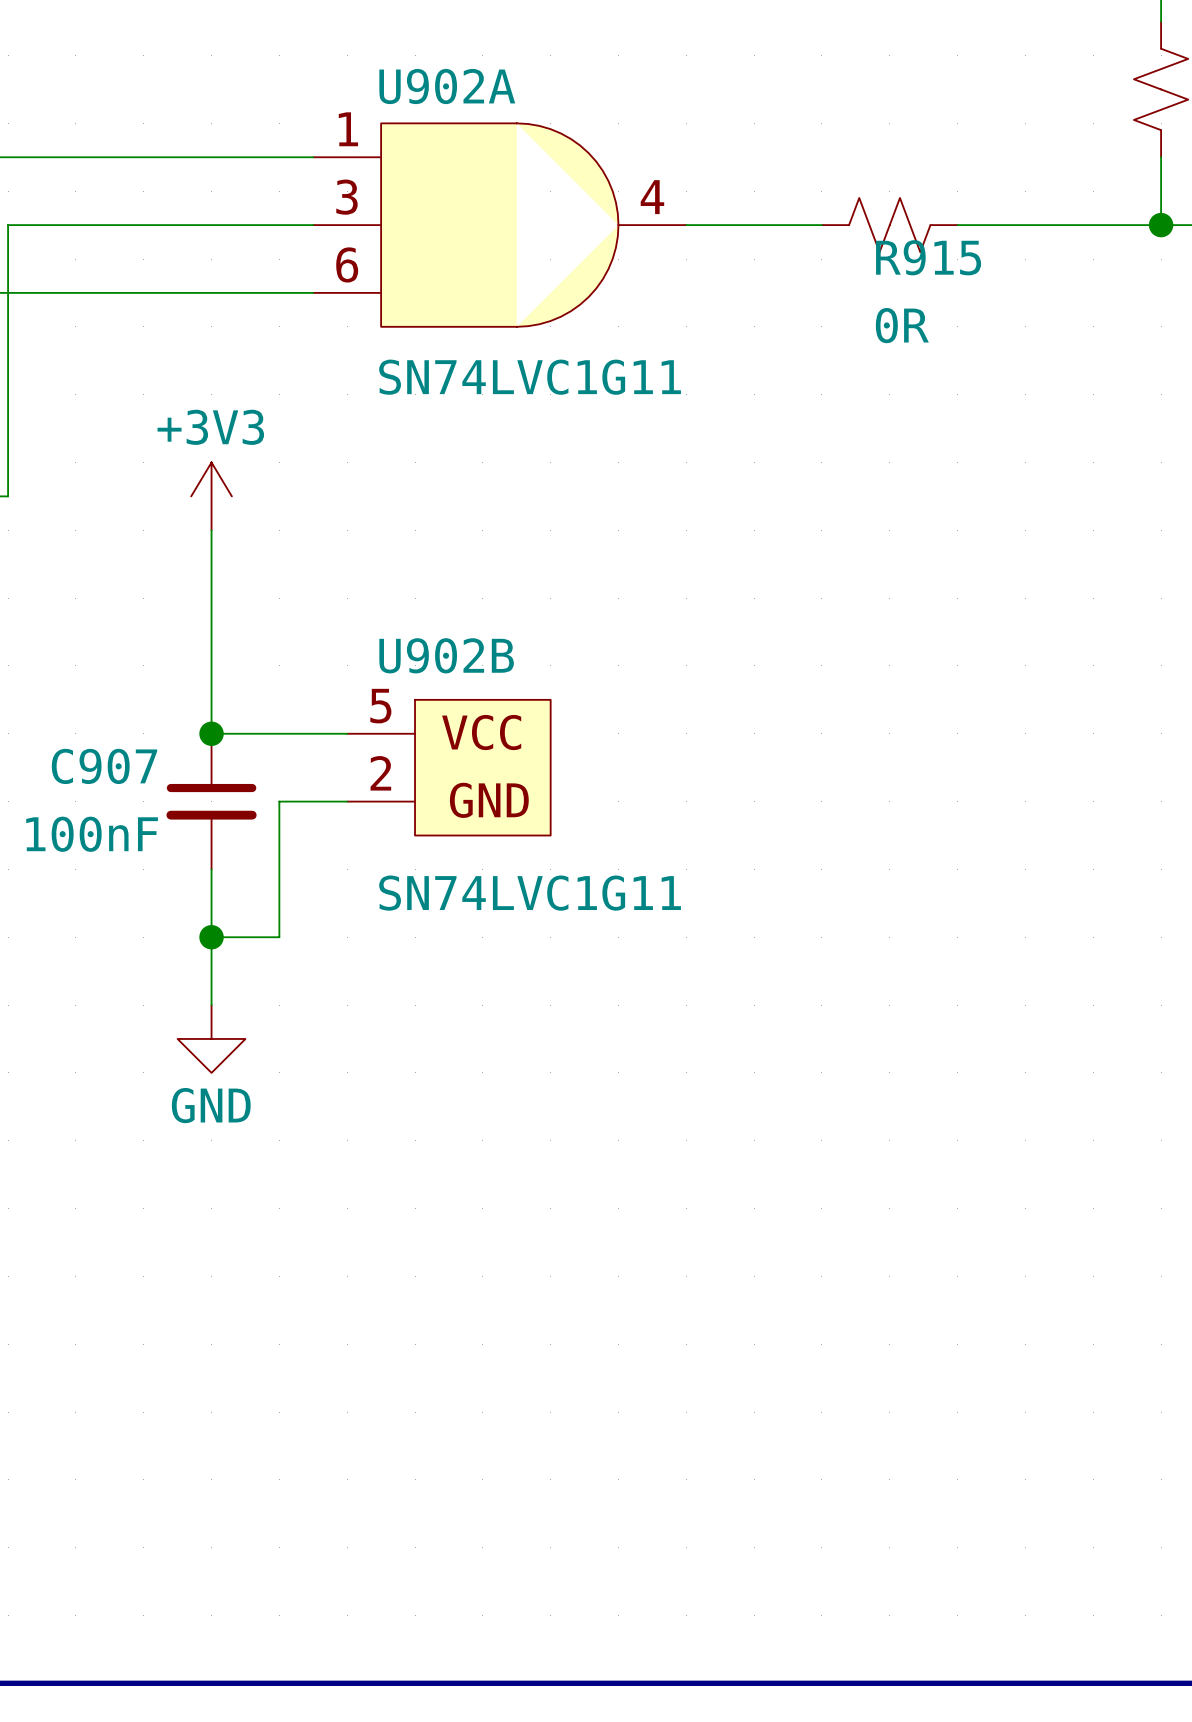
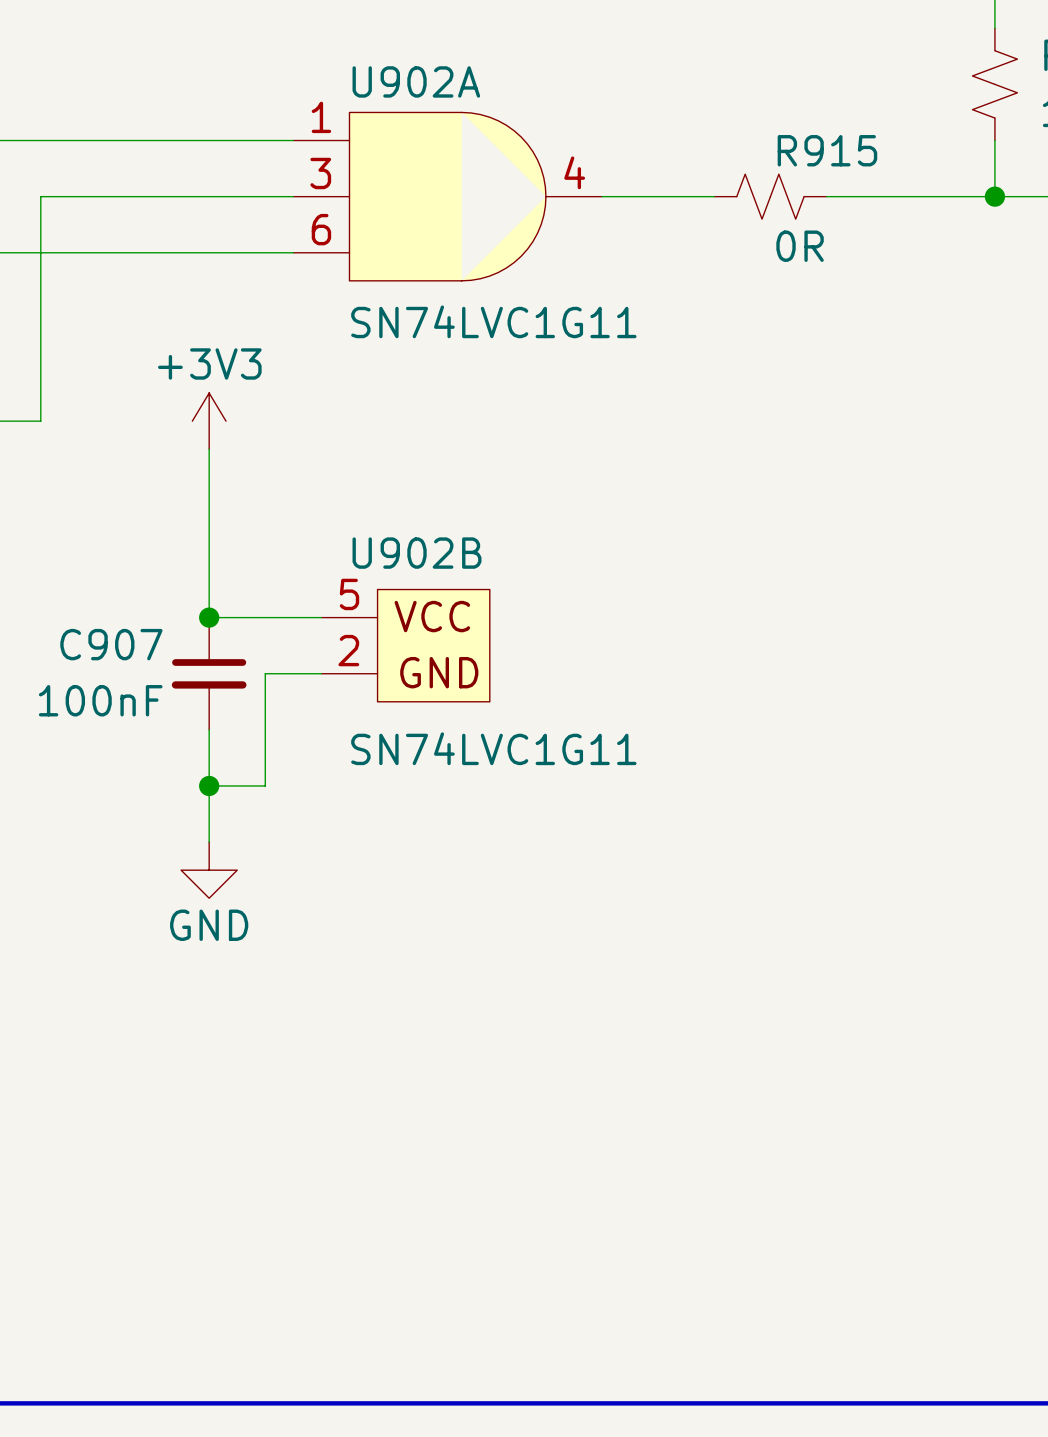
R915 name position: R915 (928, 257) -> R915 (827, 150)
R915 value position: 0R (902, 325) -> 0R (800, 246)

